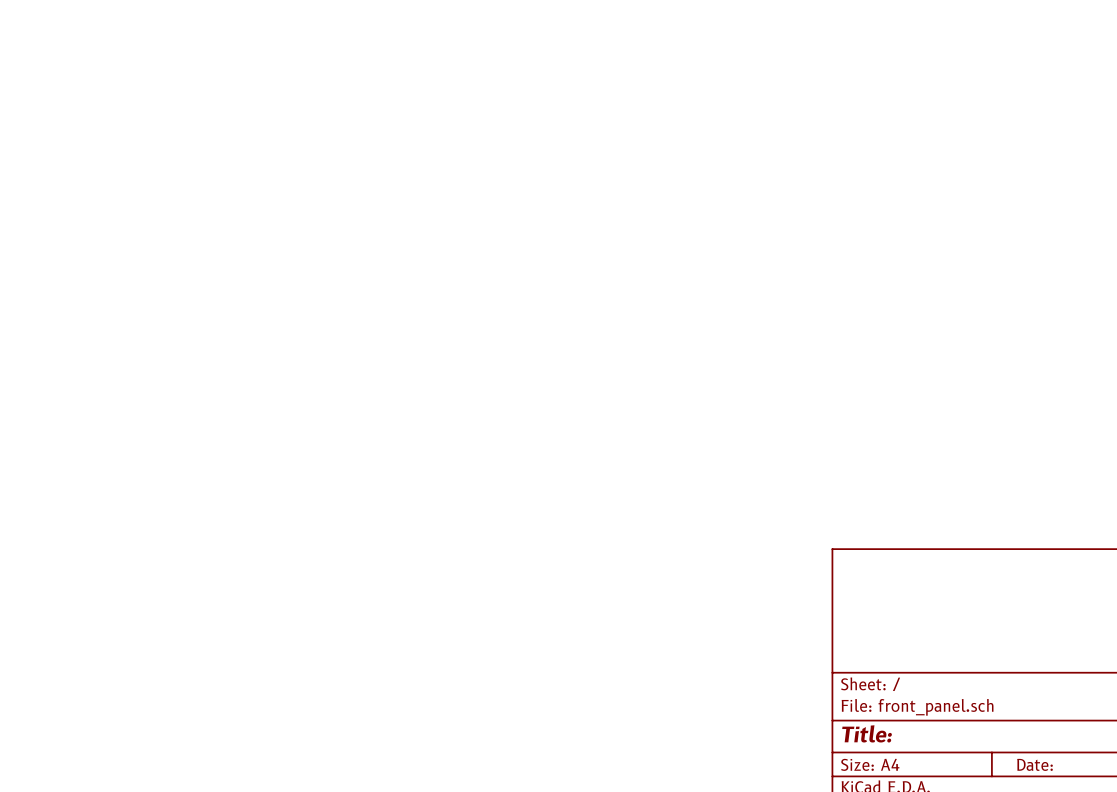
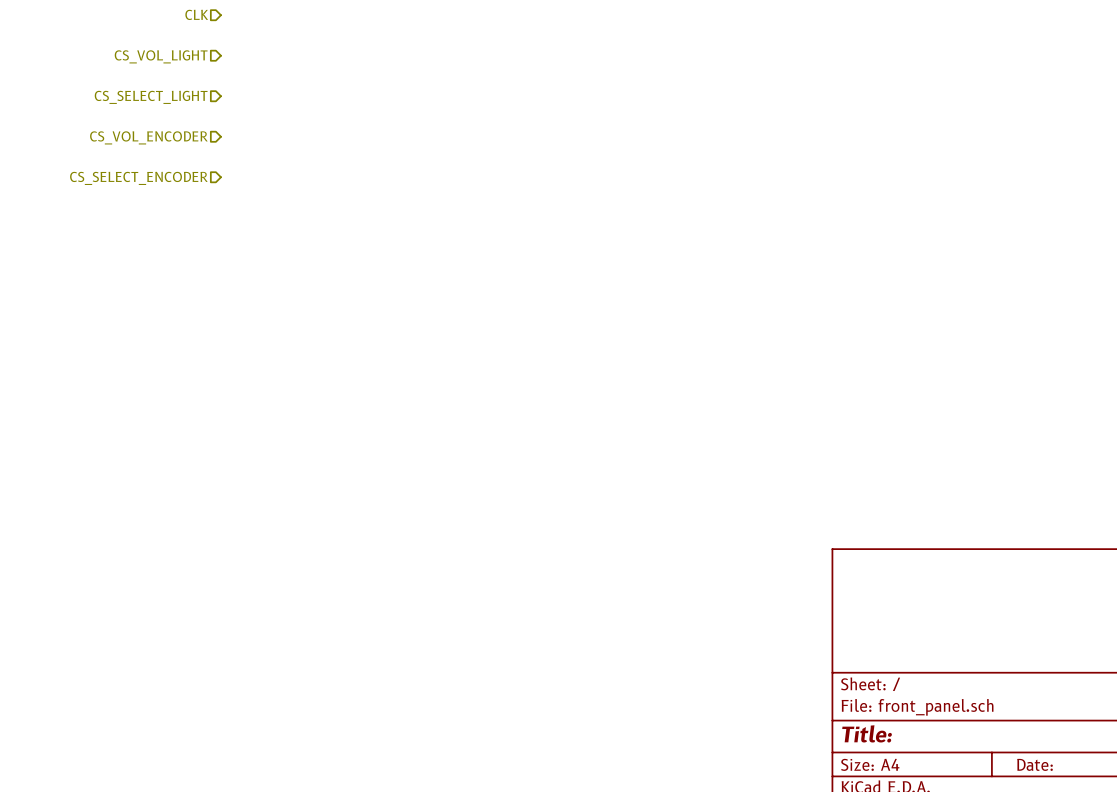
hierarchical label: none -> CLK (196, 14)
hierarchical label: none -> CS_VOL_LIGHT (161, 56)
hierarchical label: none -> CS_SELECT_LIGHT (151, 97)
hierarchical label: none -> CS_VOL_ENCODER (148, 137)
hierarchical label: none -> CS_SELECT_ENCODER (138, 178)

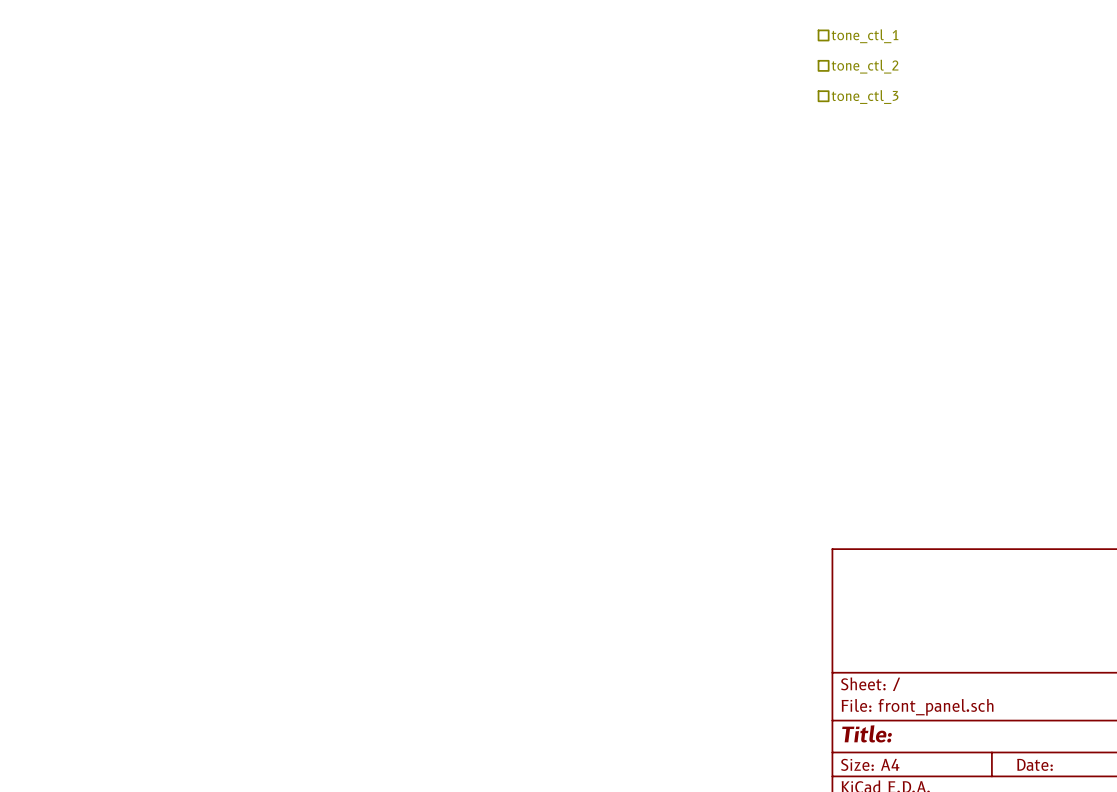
hierarchical label: CLK (196, 14) -> none
hierarchical label: none -> tone_ctl_1 (865, 36)
hierarchical label: CS_VOL_LIGHT (161, 56) -> none
hierarchical label: none -> tone_ctl_2 (865, 66)
hierarchical label: CS_SELECT_LIGHT (151, 97) -> none
hierarchical label: none -> tone_ctl_3 (865, 97)
hierarchical label: CS_VOL_ENCODER (148, 137) -> none
hierarchical label: CS_SELECT_ENCODER (138, 178) -> none

